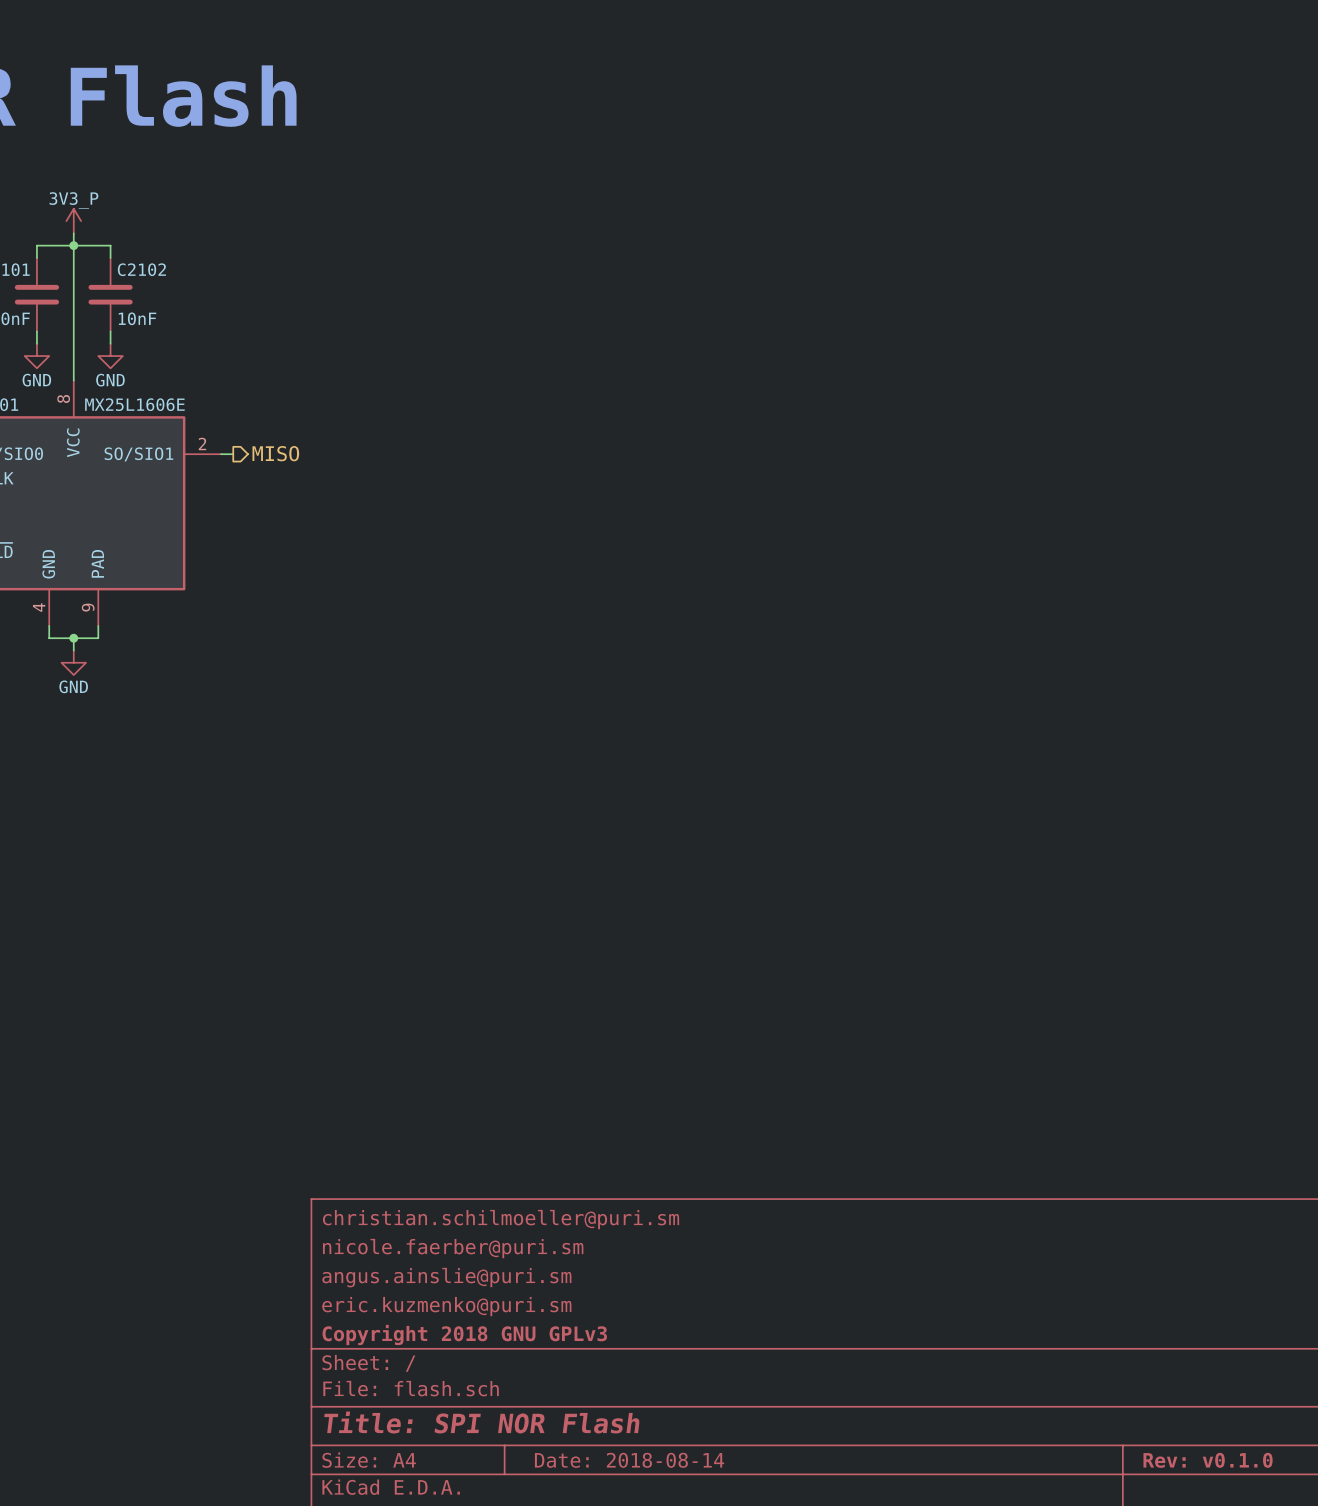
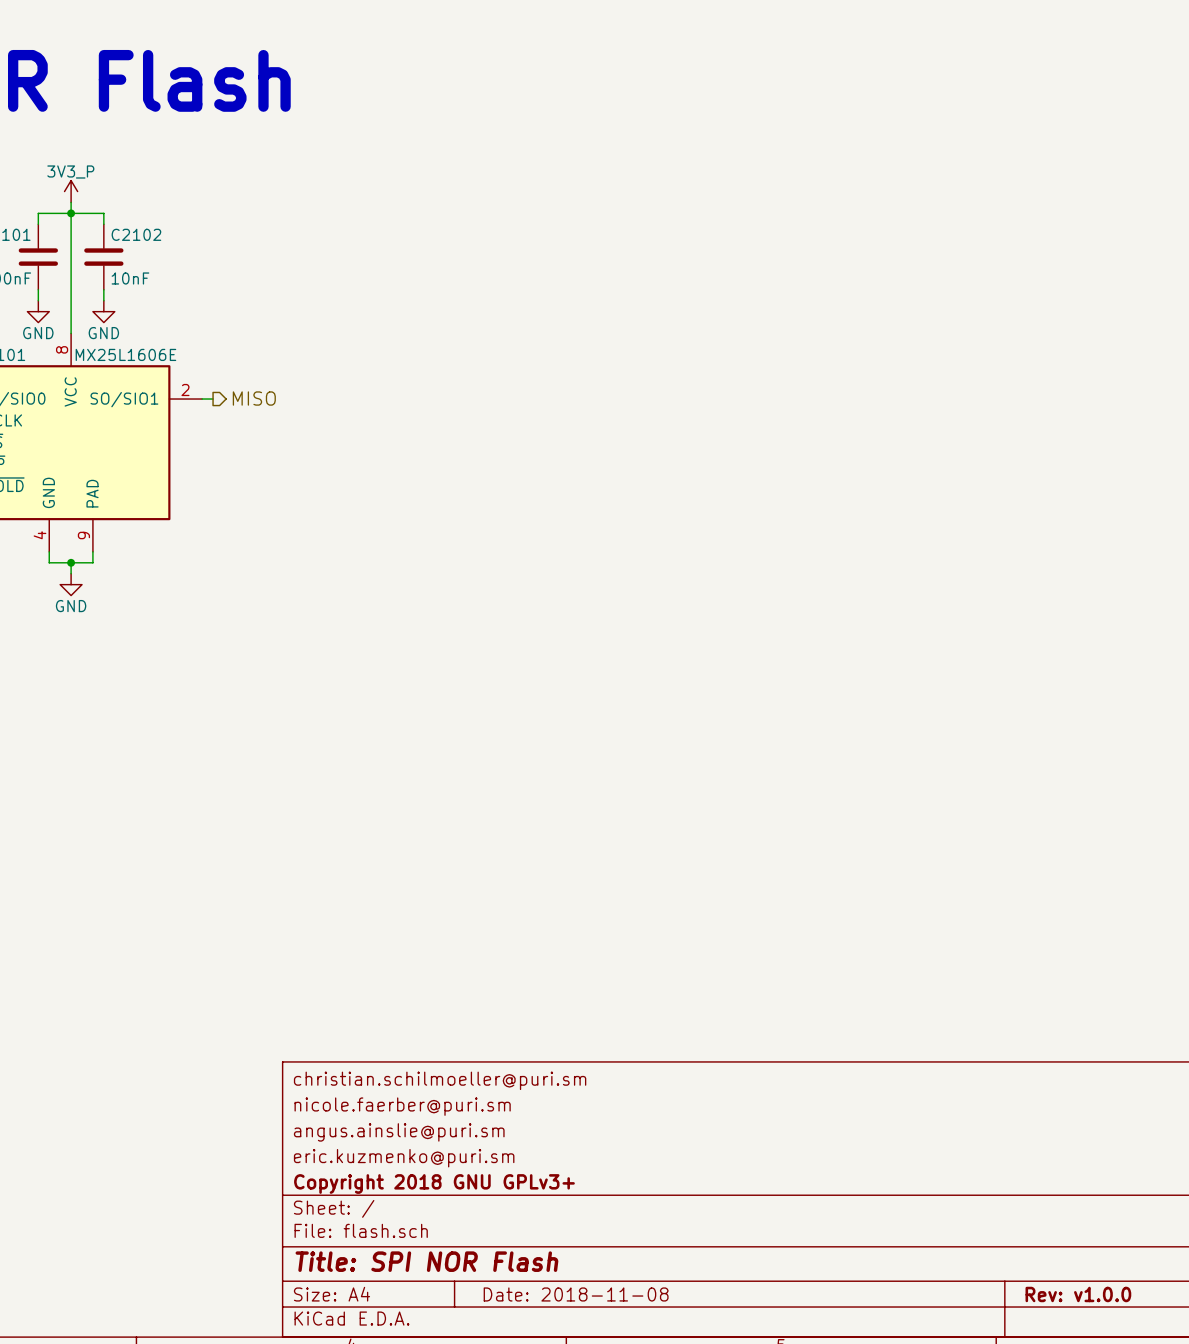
title block: Copyright 2018 GNU GPLv3 (464, 1335) -> Copyright 2018 GNU GPLv3+ (434, 1184)
title block: Date: 2018-08-14 (629, 1460) -> Date: 2018-11-08 (576, 1294)
title block: Rev: v0.1.0 (1208, 1460) -> Rev: v1.0.0 (1078, 1294)

